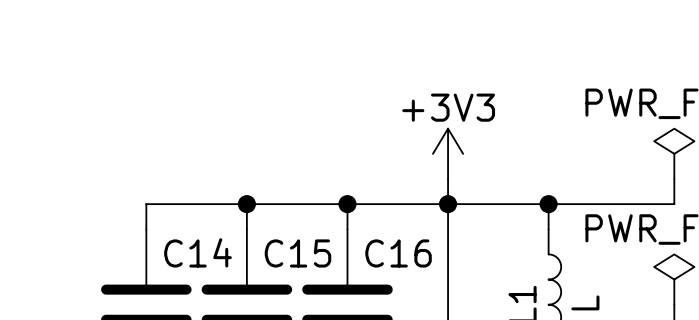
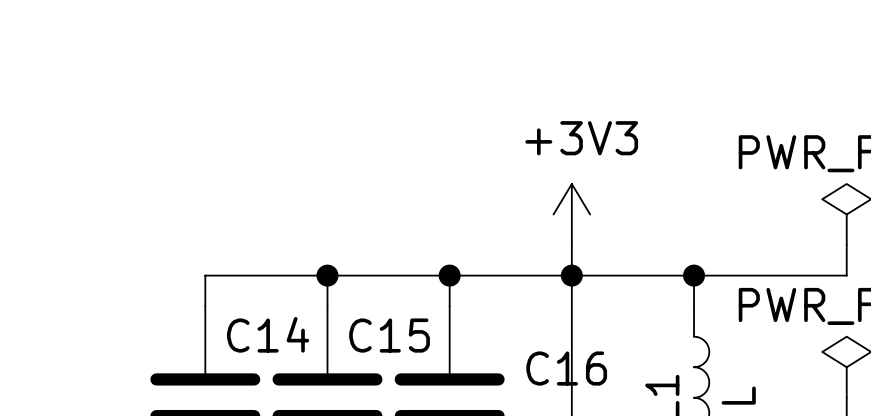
power symbol text position: +3V3 (448, 107) -> +3V3 (581, 138)
C16 name position: C16 (398, 253) -> C16 (566, 368)

